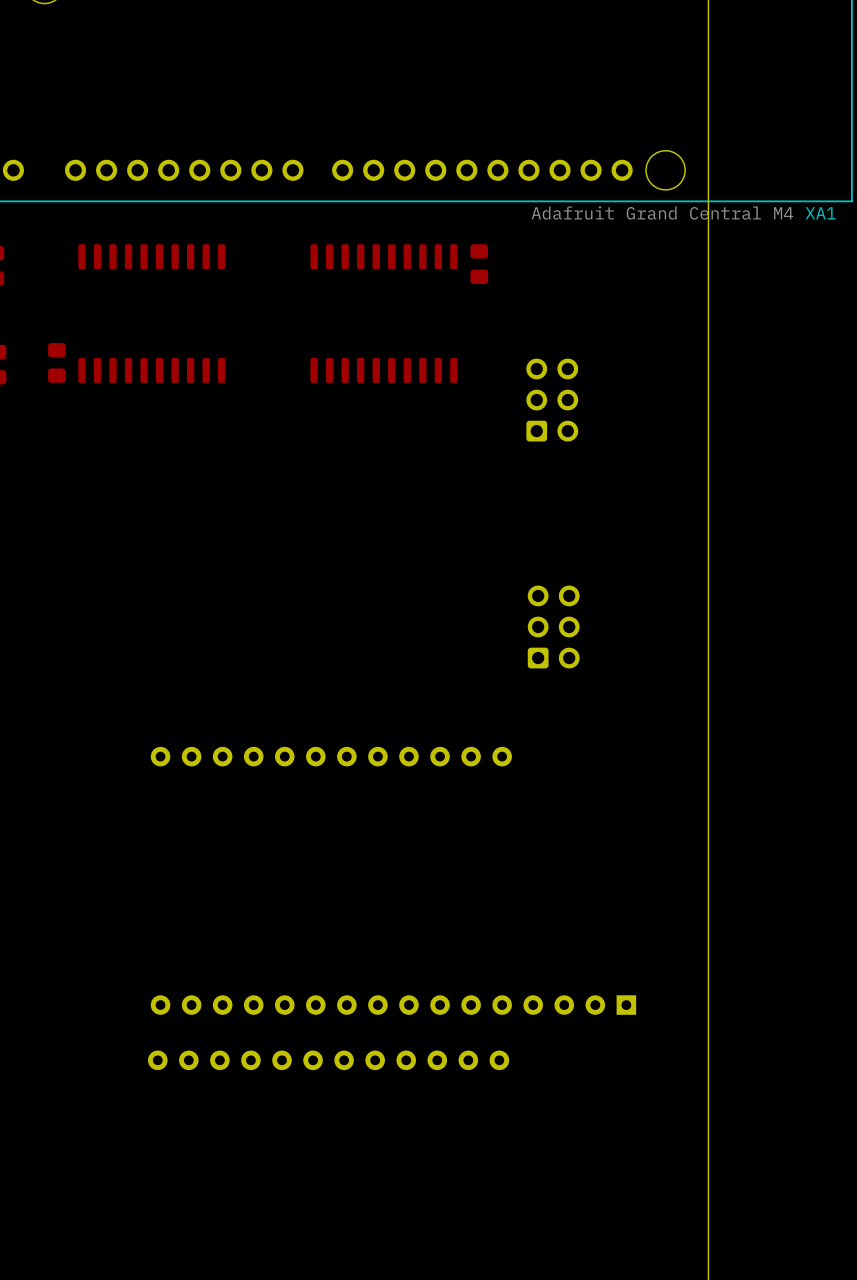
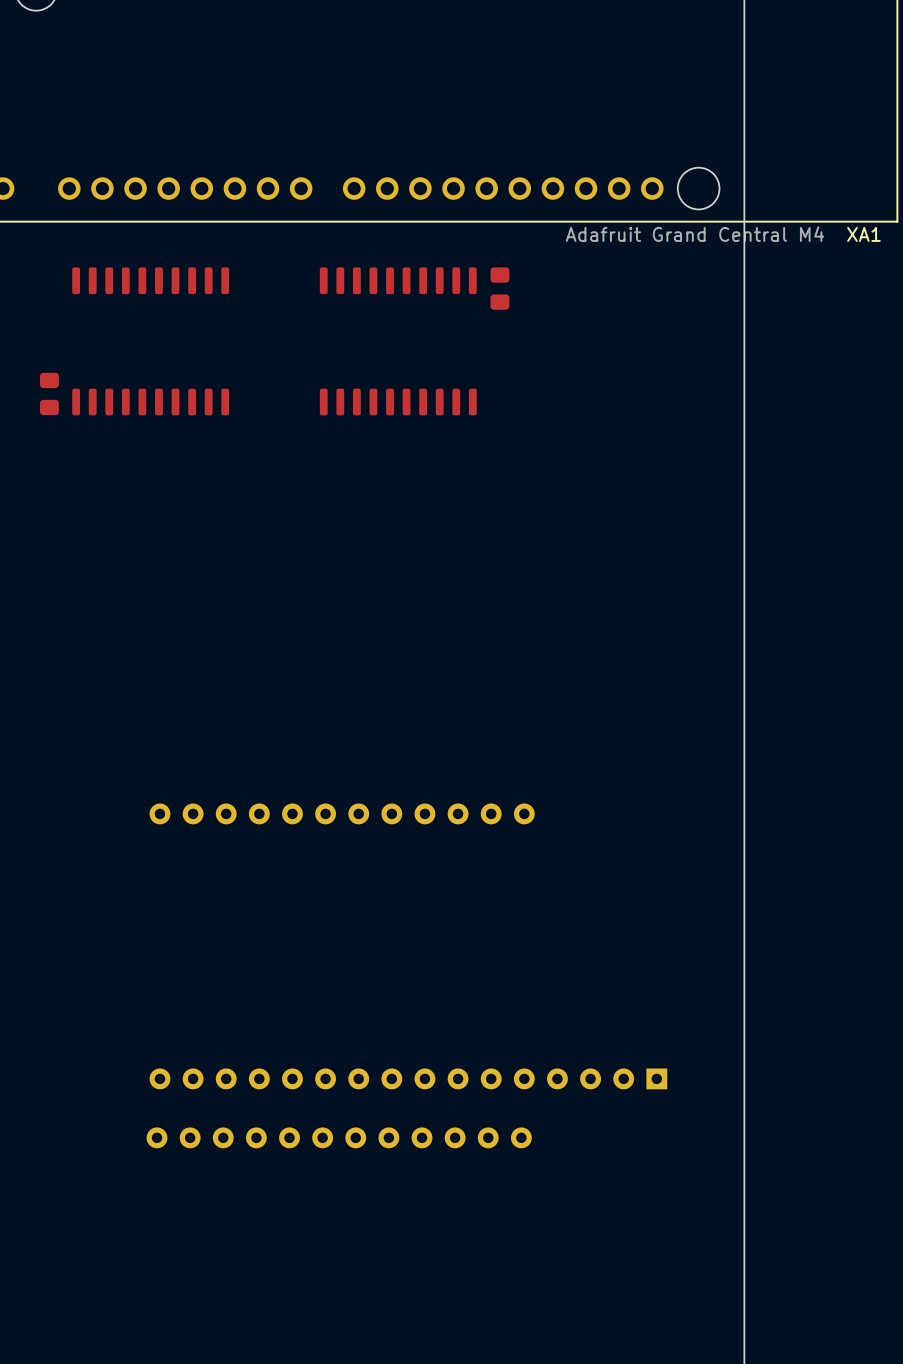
part: (552, 400) -> none
part: (553, 627) -> none

